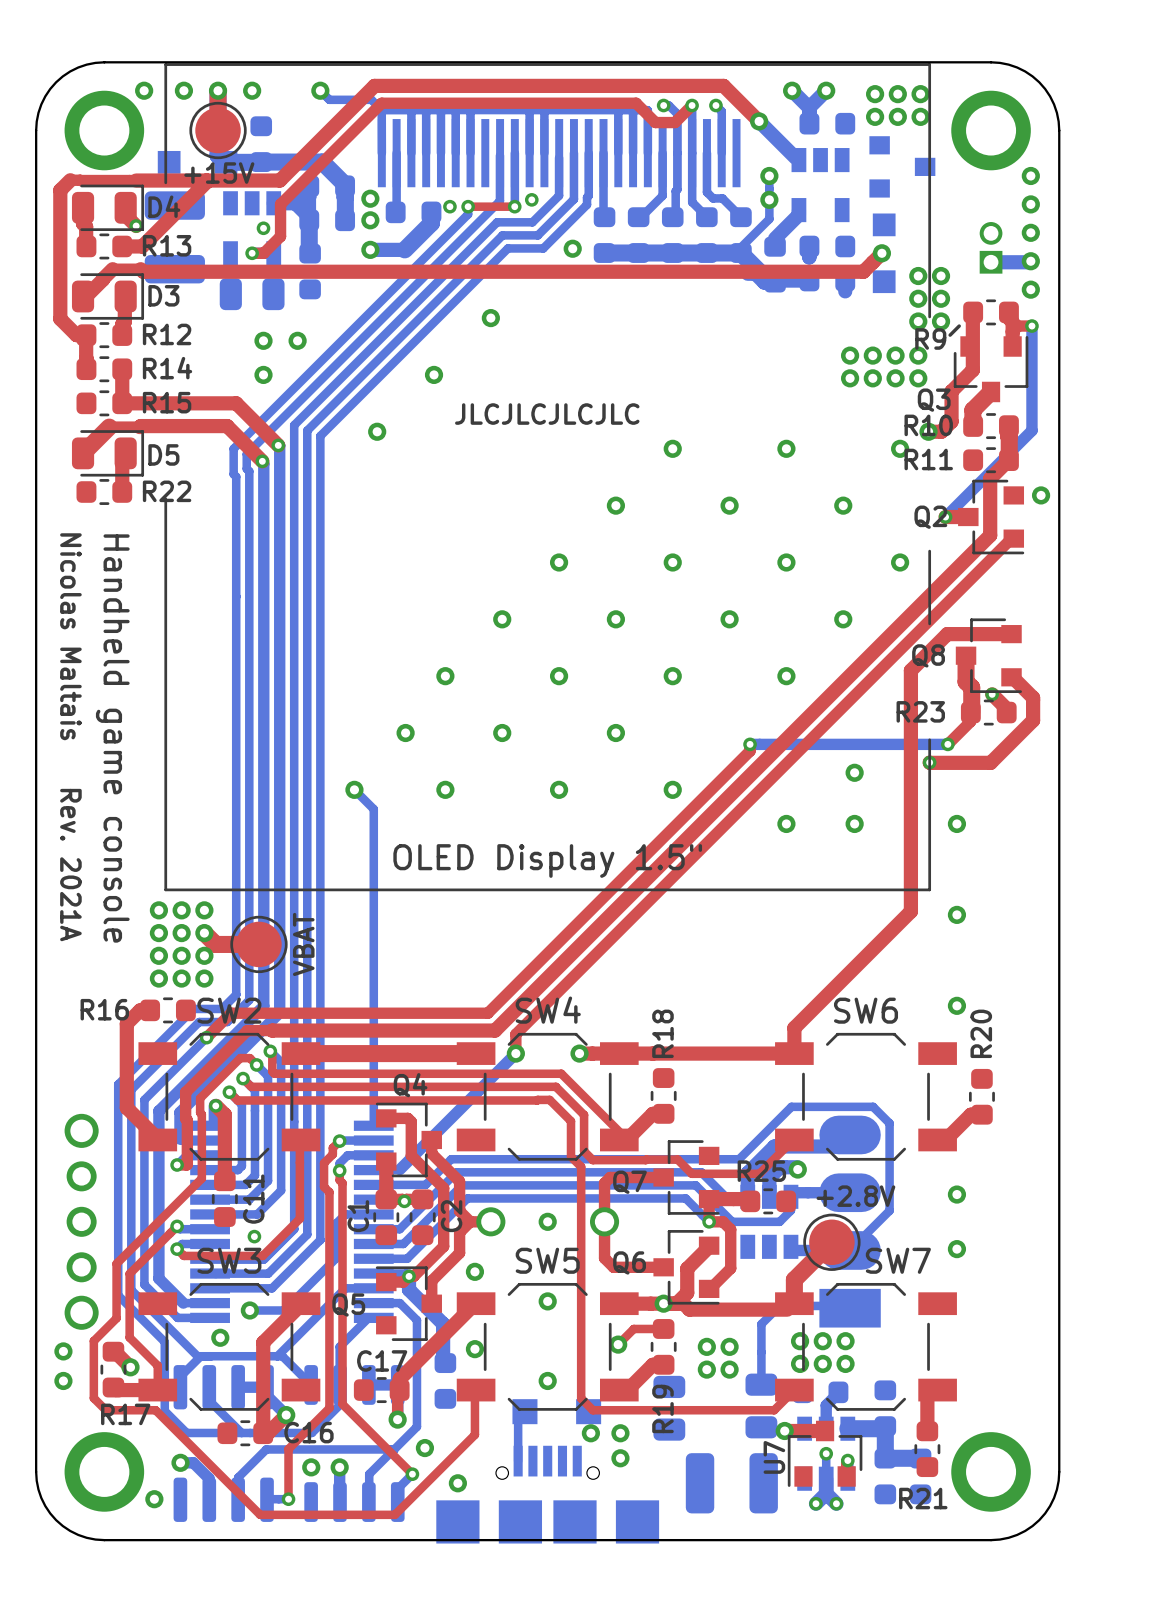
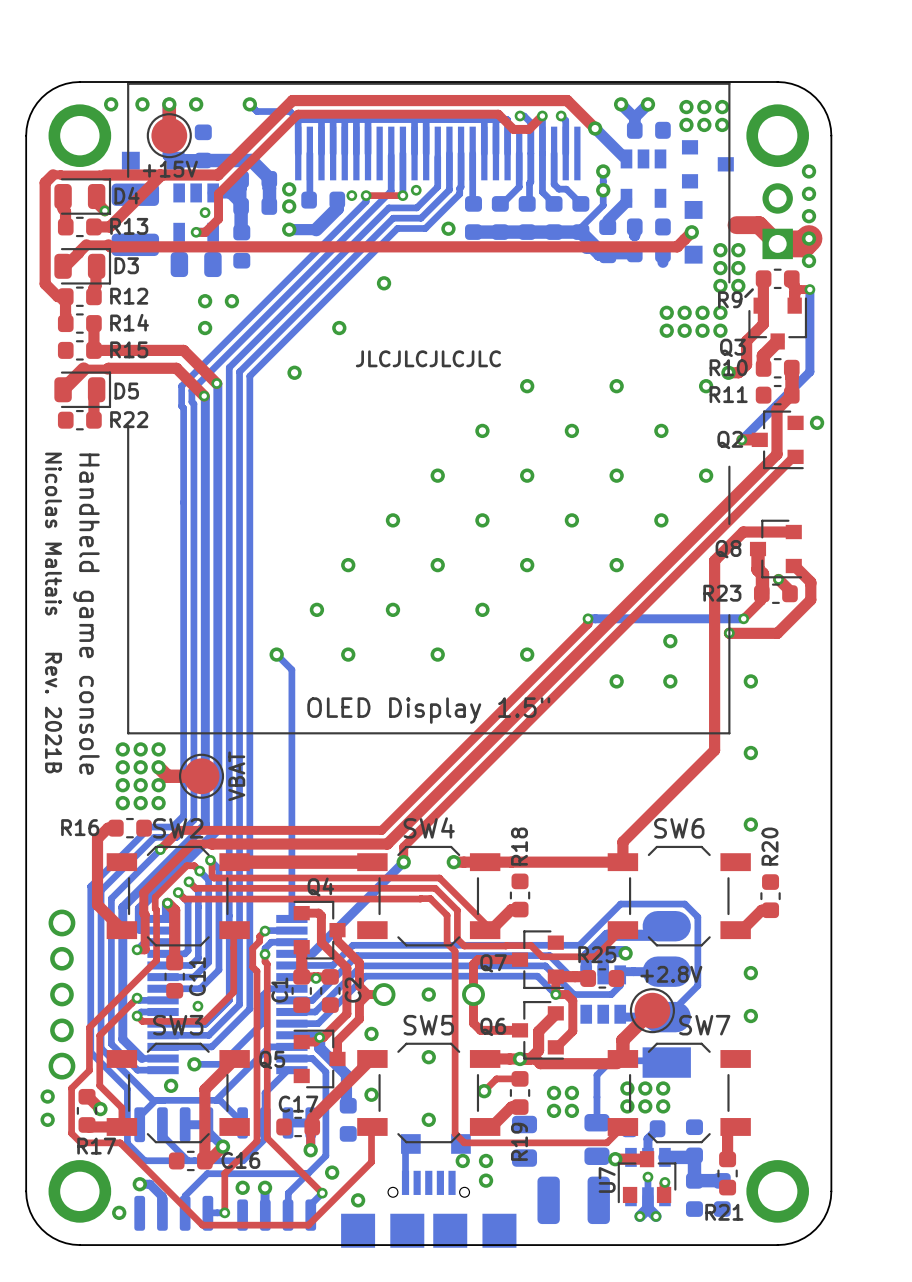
part footprint: [979, 222, 1003, 274] -> [762, 183, 793, 260]
top track: none -> (736, 225) (758, 225) (777, 243) (803, 243) (809, 238)
bottom track: (991, 262) (1029, 262) -> none
text: Rev. 2021A (70, 865) -> Rev. 2021B (53, 713)

